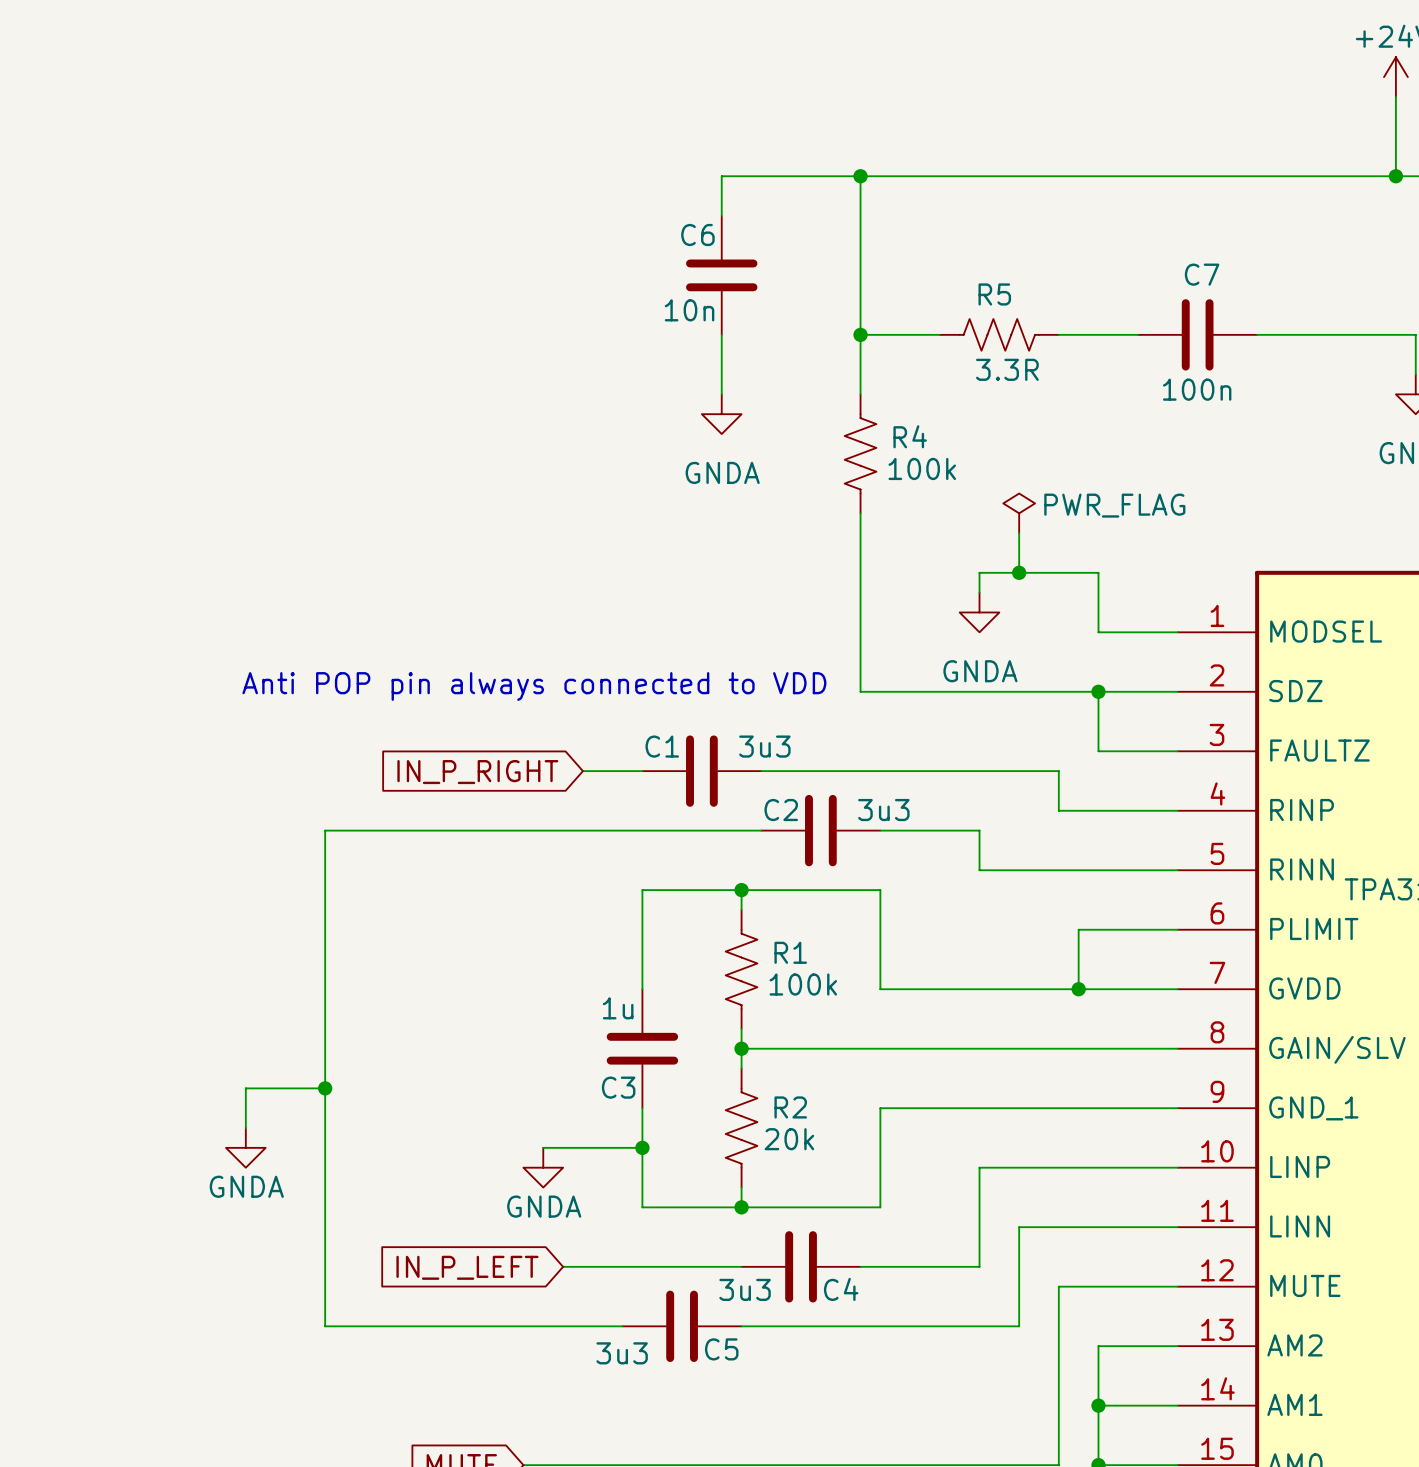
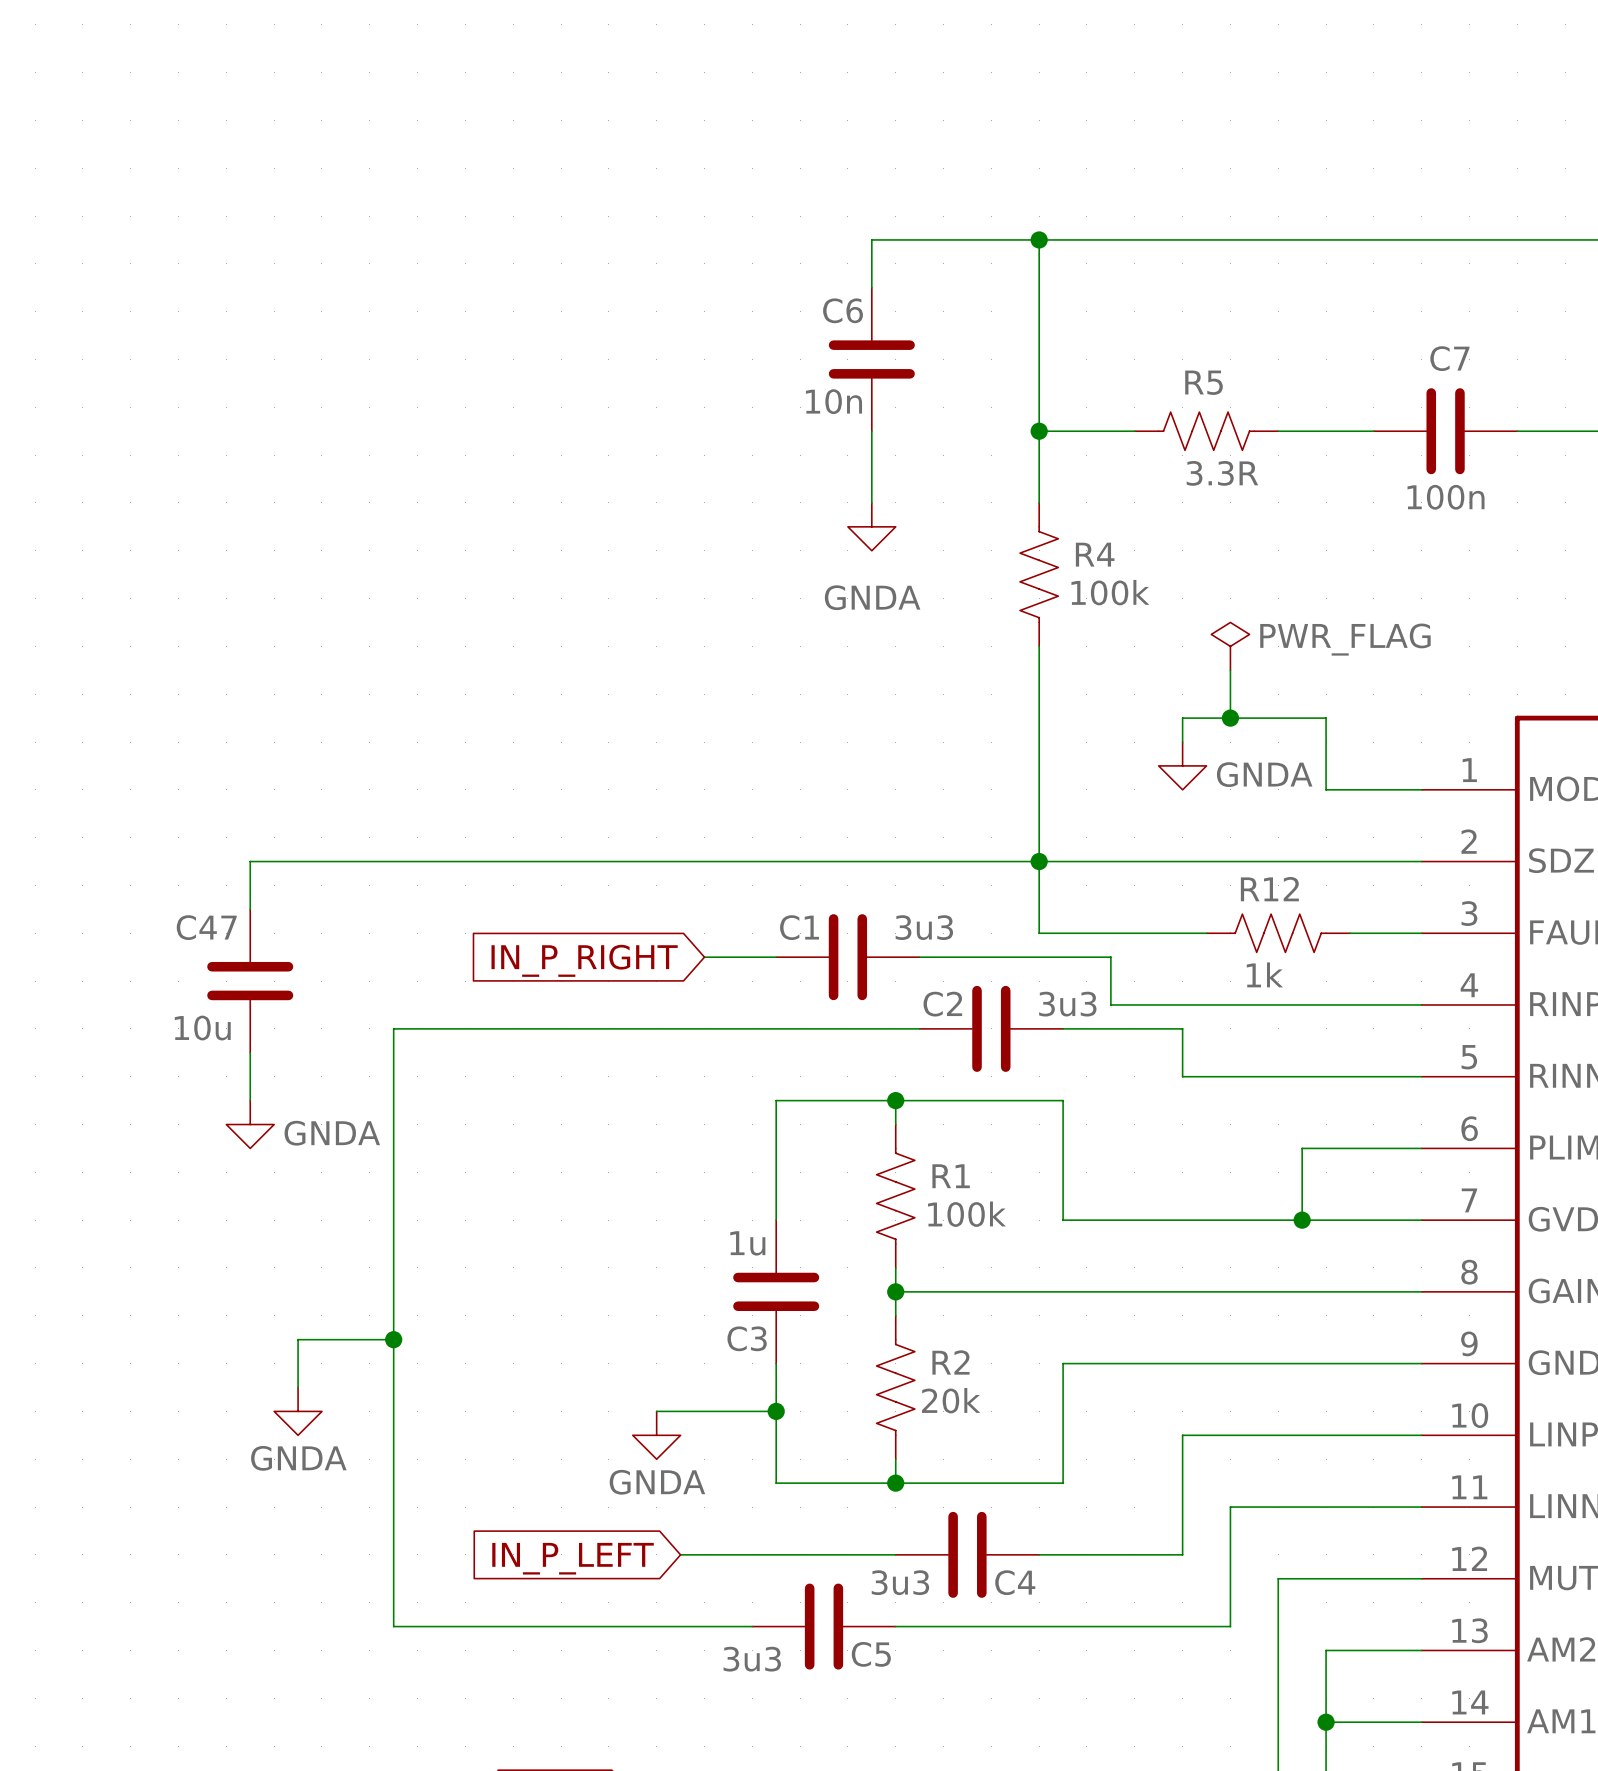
power symbol text position: GNDA (980, 671) -> GNDA (1264, 774)
text: Anti POP pin always connected to VDD (534, 686) -> none
junction: none -> (1039, 861)
wire: (1098, 691) (1098, 751) (1118, 751) -> none
junction: (1098, 691) -> none
wire: none -> (250, 909) (250, 861) (1039, 861) (1039, 933) (1206, 933)
R12: none -> 1k (1278, 933)
wire: (920, 771) (1058, 771) (1058, 810) -> (1110, 957) (1110, 1004) (1278, 1004)
C47: none -> 10u (250, 981)
wire: none -> (250, 1052) (250, 1100)
power symbol: none -> GNDA (250, 1124)

